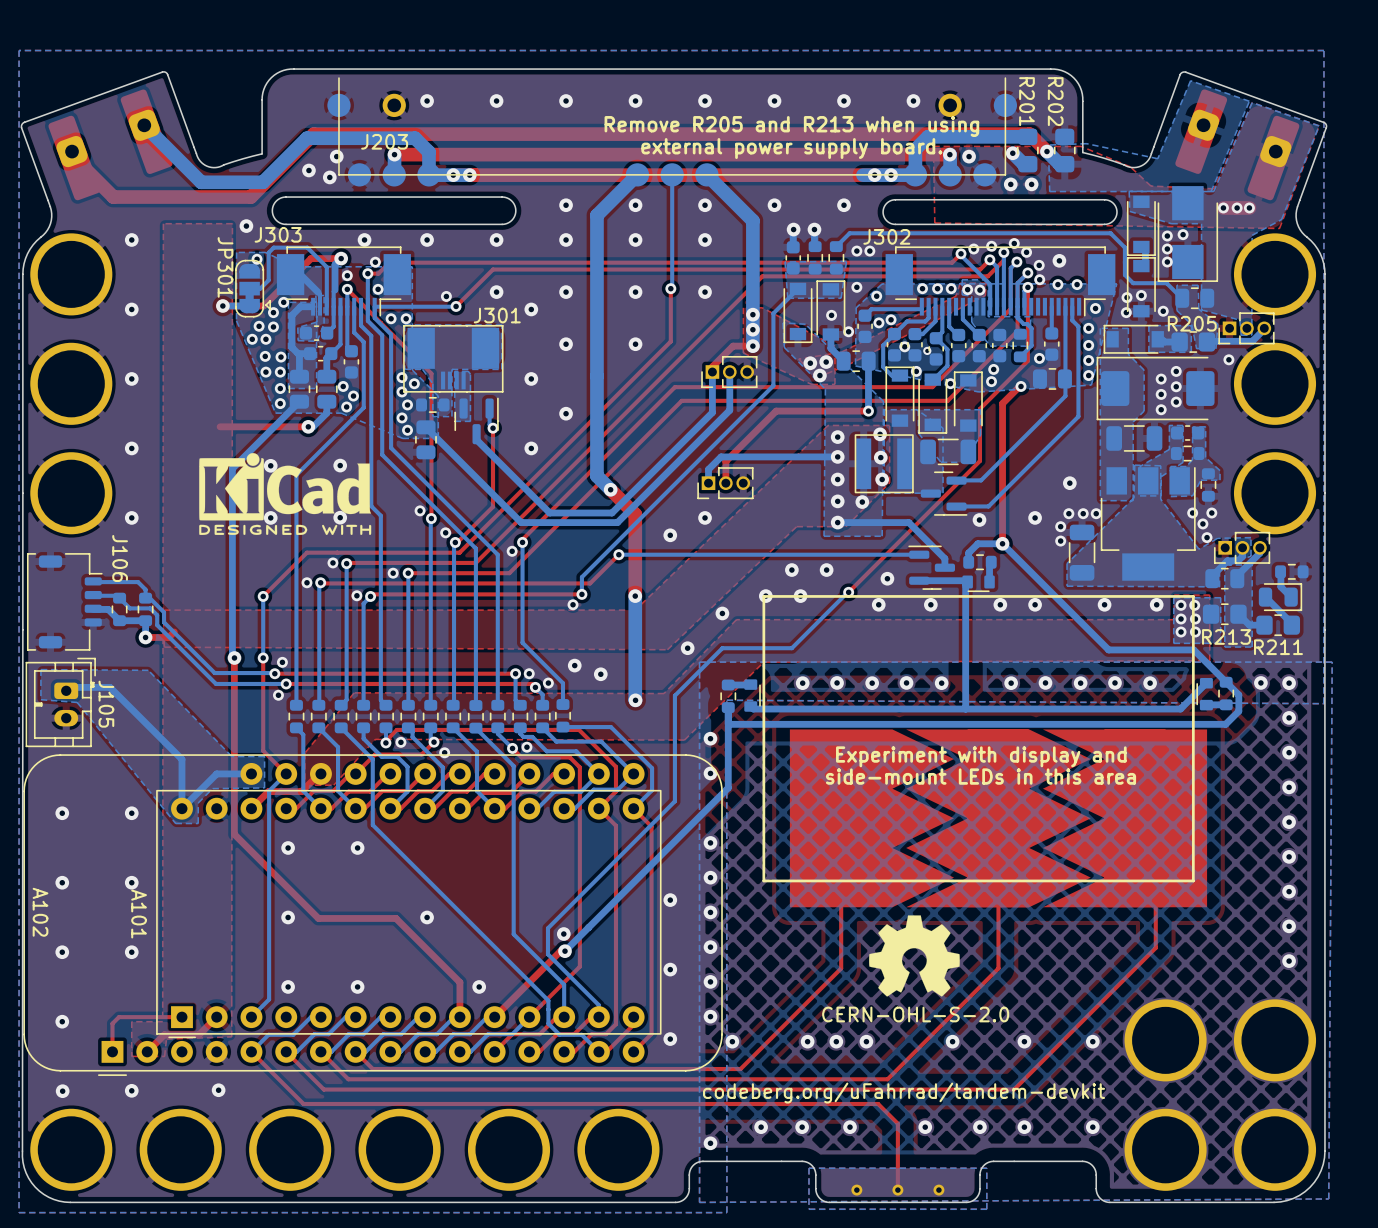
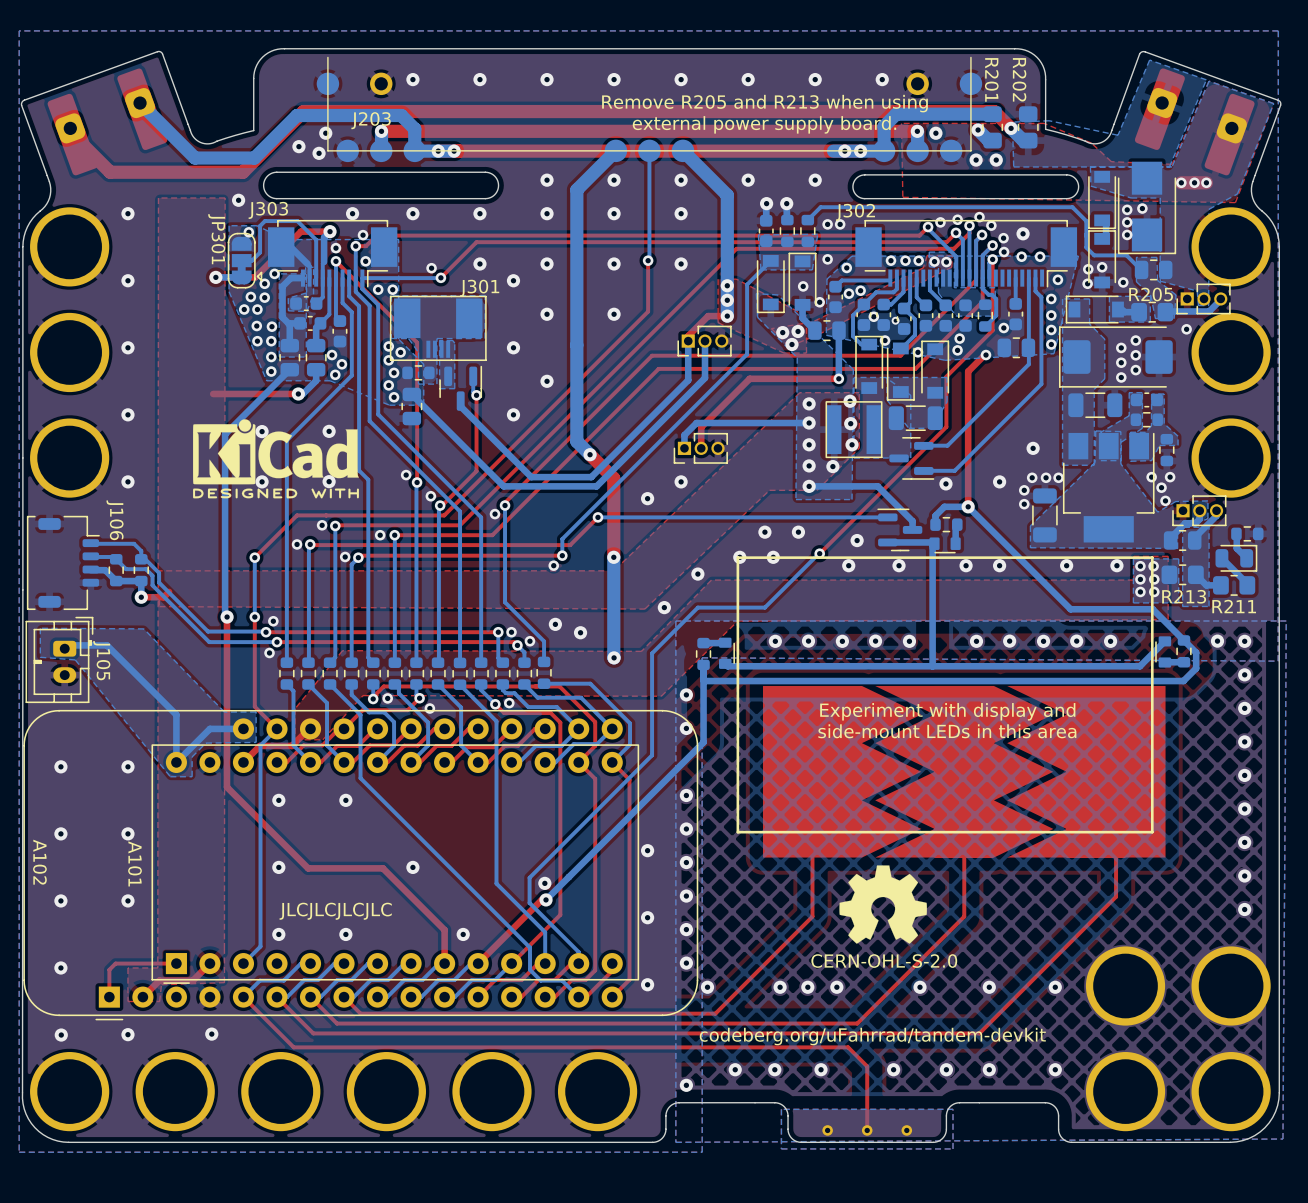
text: none -> JLCJLCJLCJLC (335, 911)

